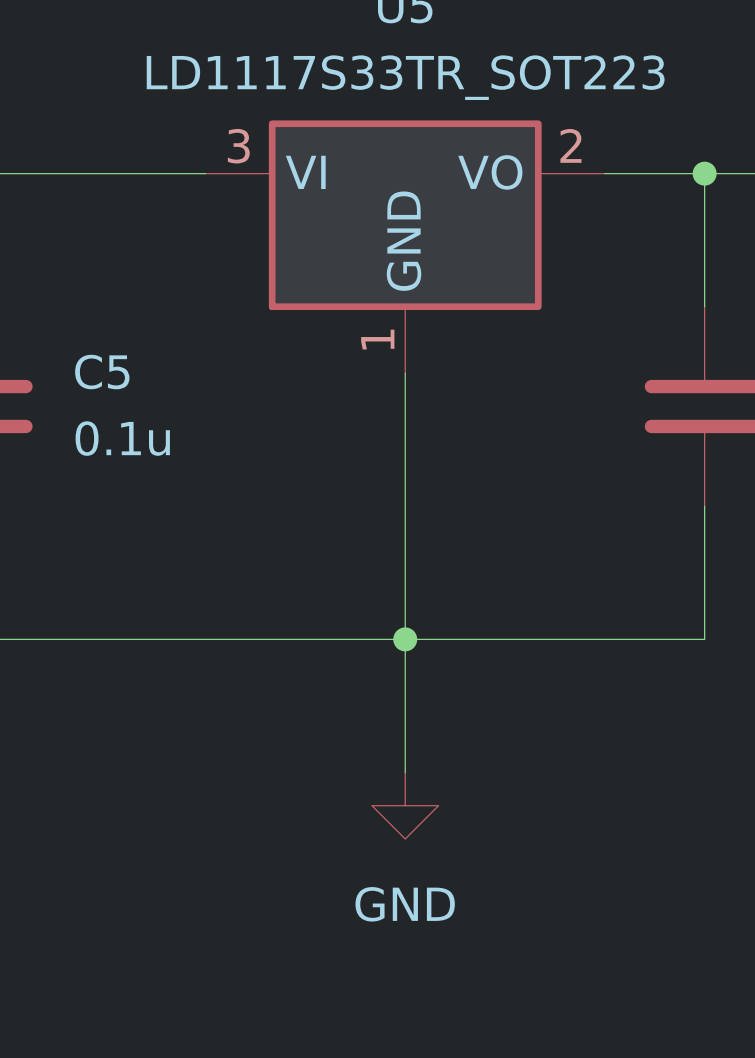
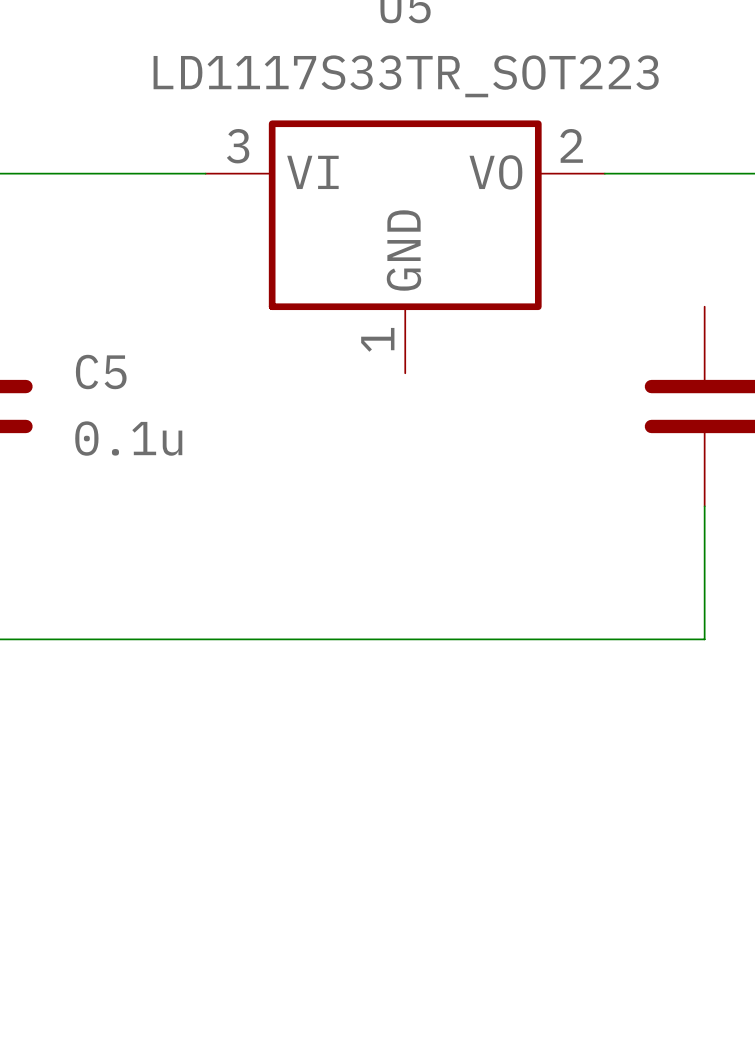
wire: (704, 173) (704, 306) -> none
junction: (704, 173) -> none
wire: (405, 373) (405, 772) -> none
junction: (405, 639) -> none
power symbol: GND (405, 805) -> none

